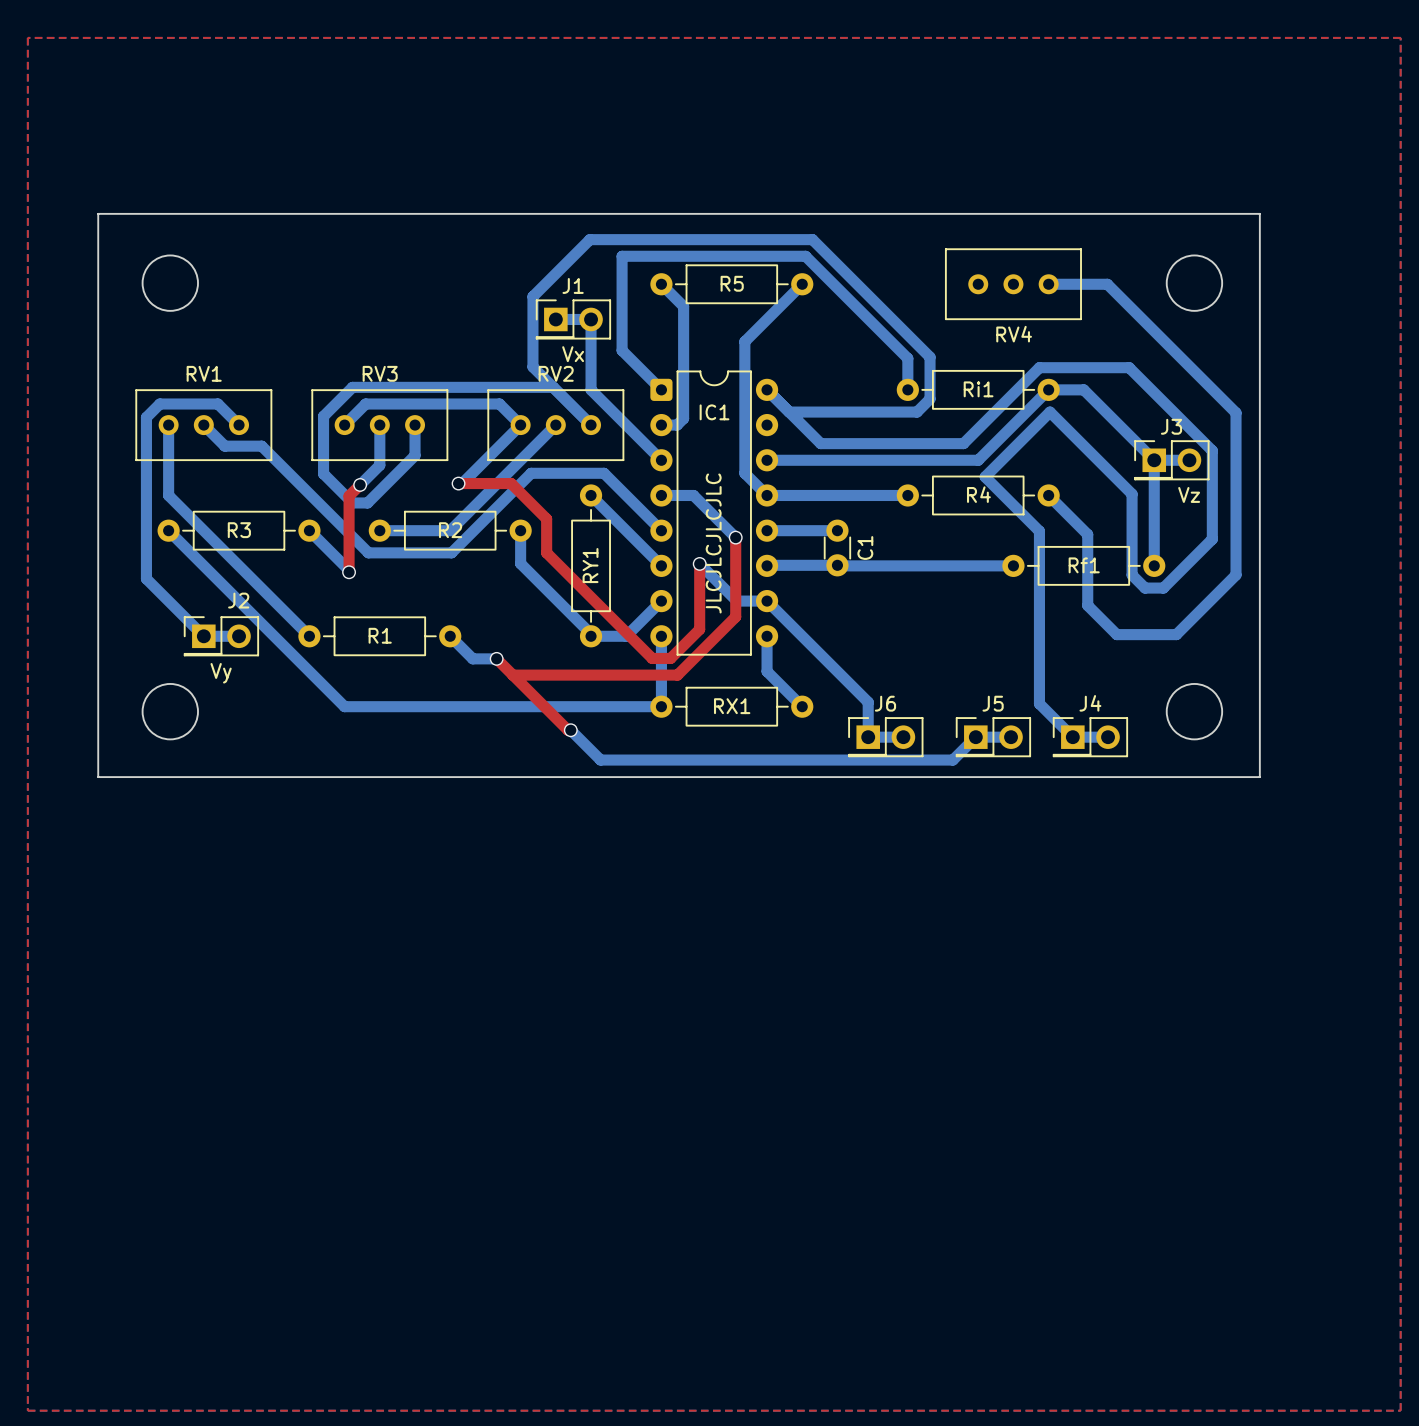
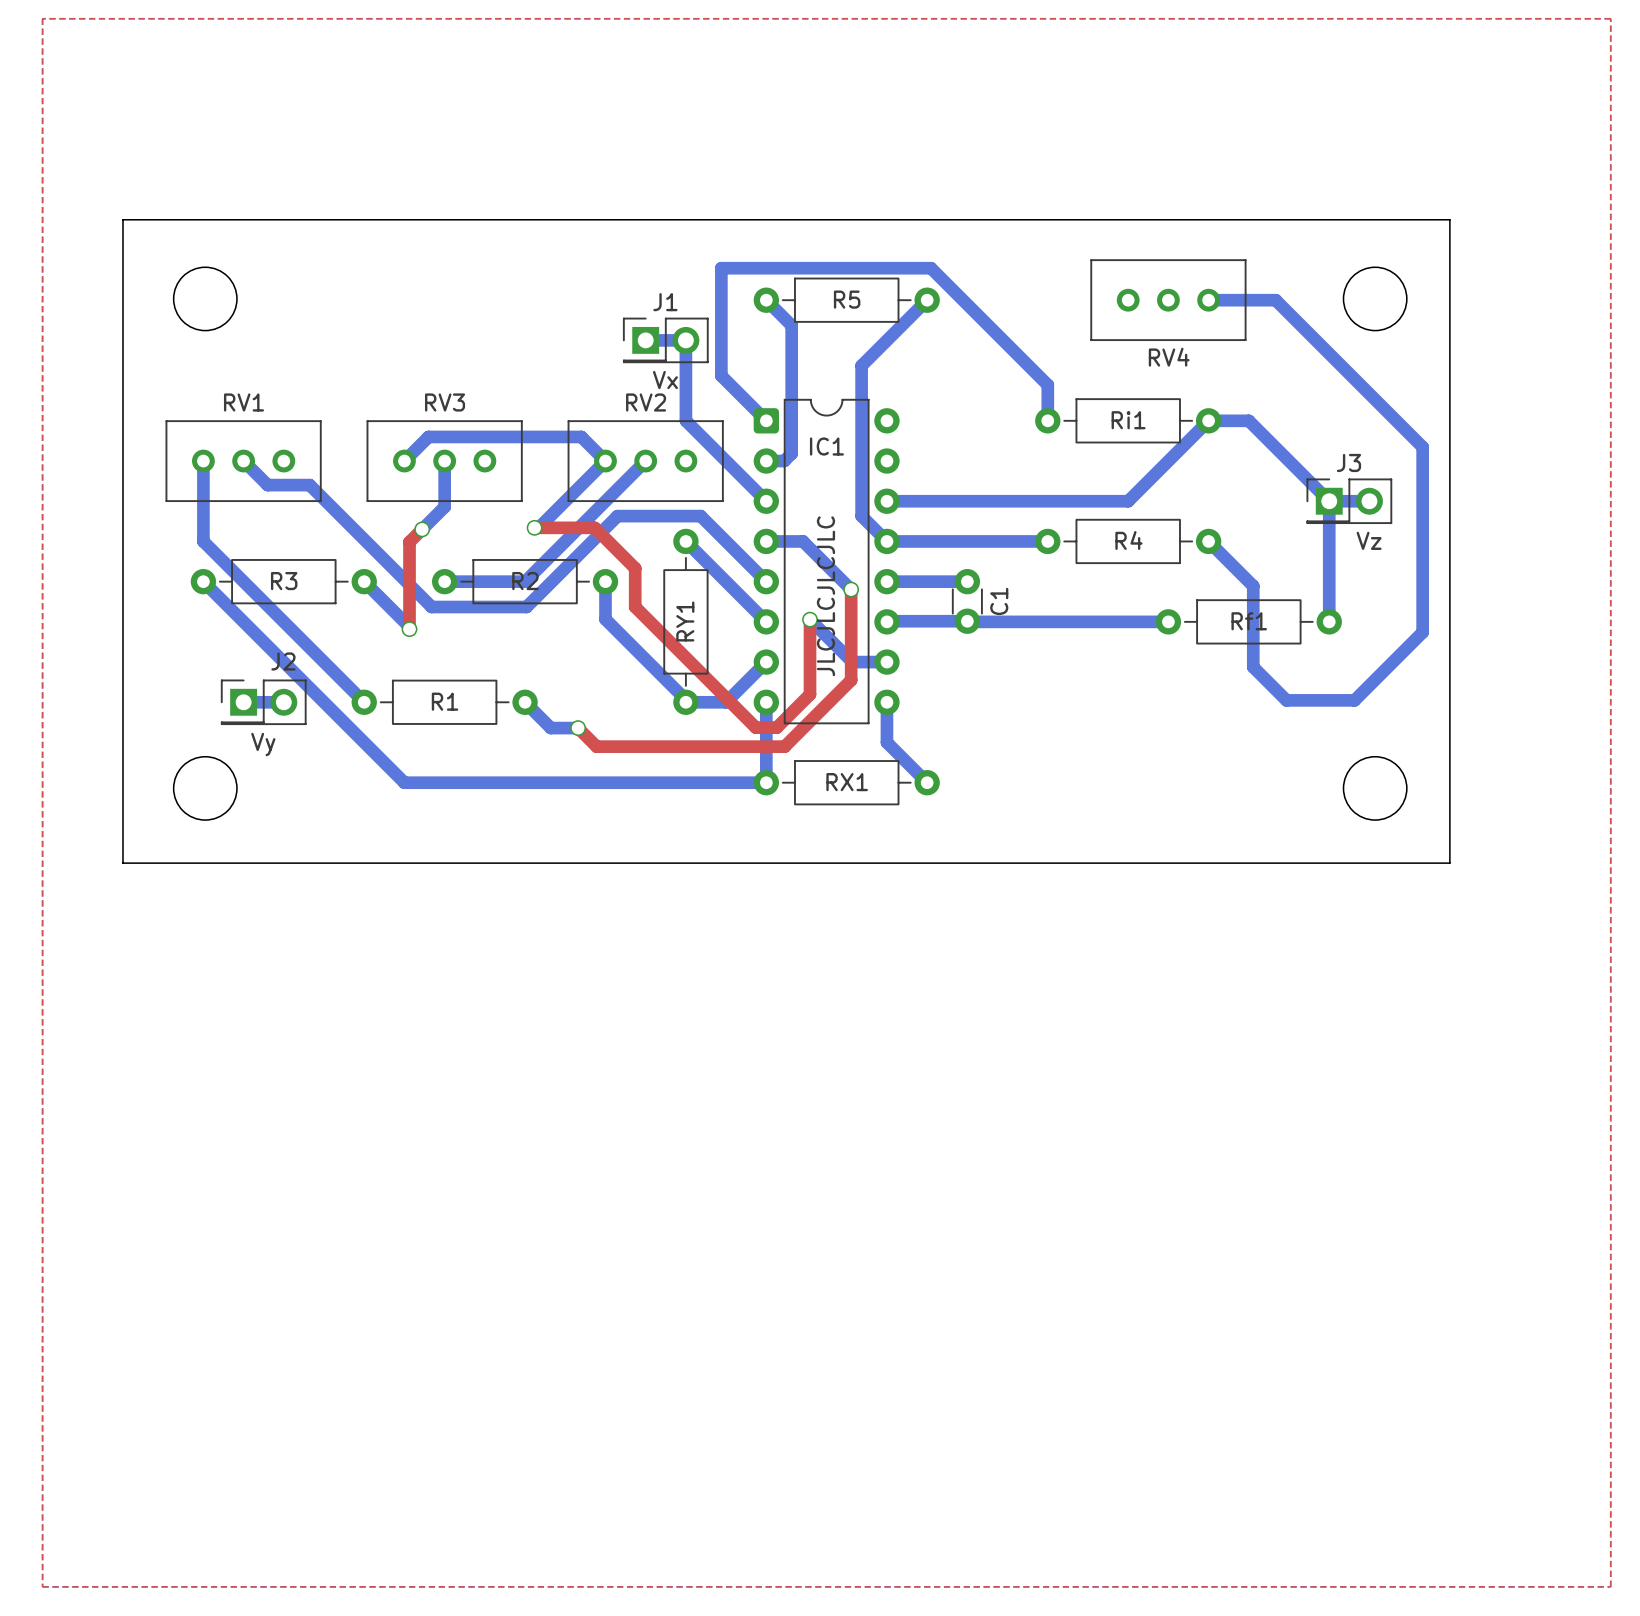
bottom track: (553, 387) (352, 387) (323, 416) (323, 473) (352, 502) (367, 502) (415, 455) (415, 425) -> none
bottom track: (767, 389) (820, 443) (963, 443) (1039, 367) (1129, 367) (1212, 450) (1212, 539) (1163, 588) (1145, 588) (1132, 575) (1132, 494) (1050, 412) (985, 476) (1039, 531) (1039, 703) (1072, 737) (1108, 737) -> none
bottom track: (789, 412) (917, 412) (930, 399) (930, 357) (812, 239) (589, 239) (532, 296) (532, 366) (591, 425) -> none
bottom track: (239, 425) (217, 404) (159, 404) (146, 417) (146, 578) (203, 636) -> none
bottom track: (767, 601) (868, 702) (868, 737) (903, 737) -> none
top track: (512, 675) (568, 730) (570, 730) -> none
bottom track: (570, 730) (600, 760) (952, 760) (975, 737) (1011, 737) -> none
via: (570, 730) -> none
J6: (885, 737) -> none
J5: (993, 737) -> none
J4: (1090, 737) -> none

